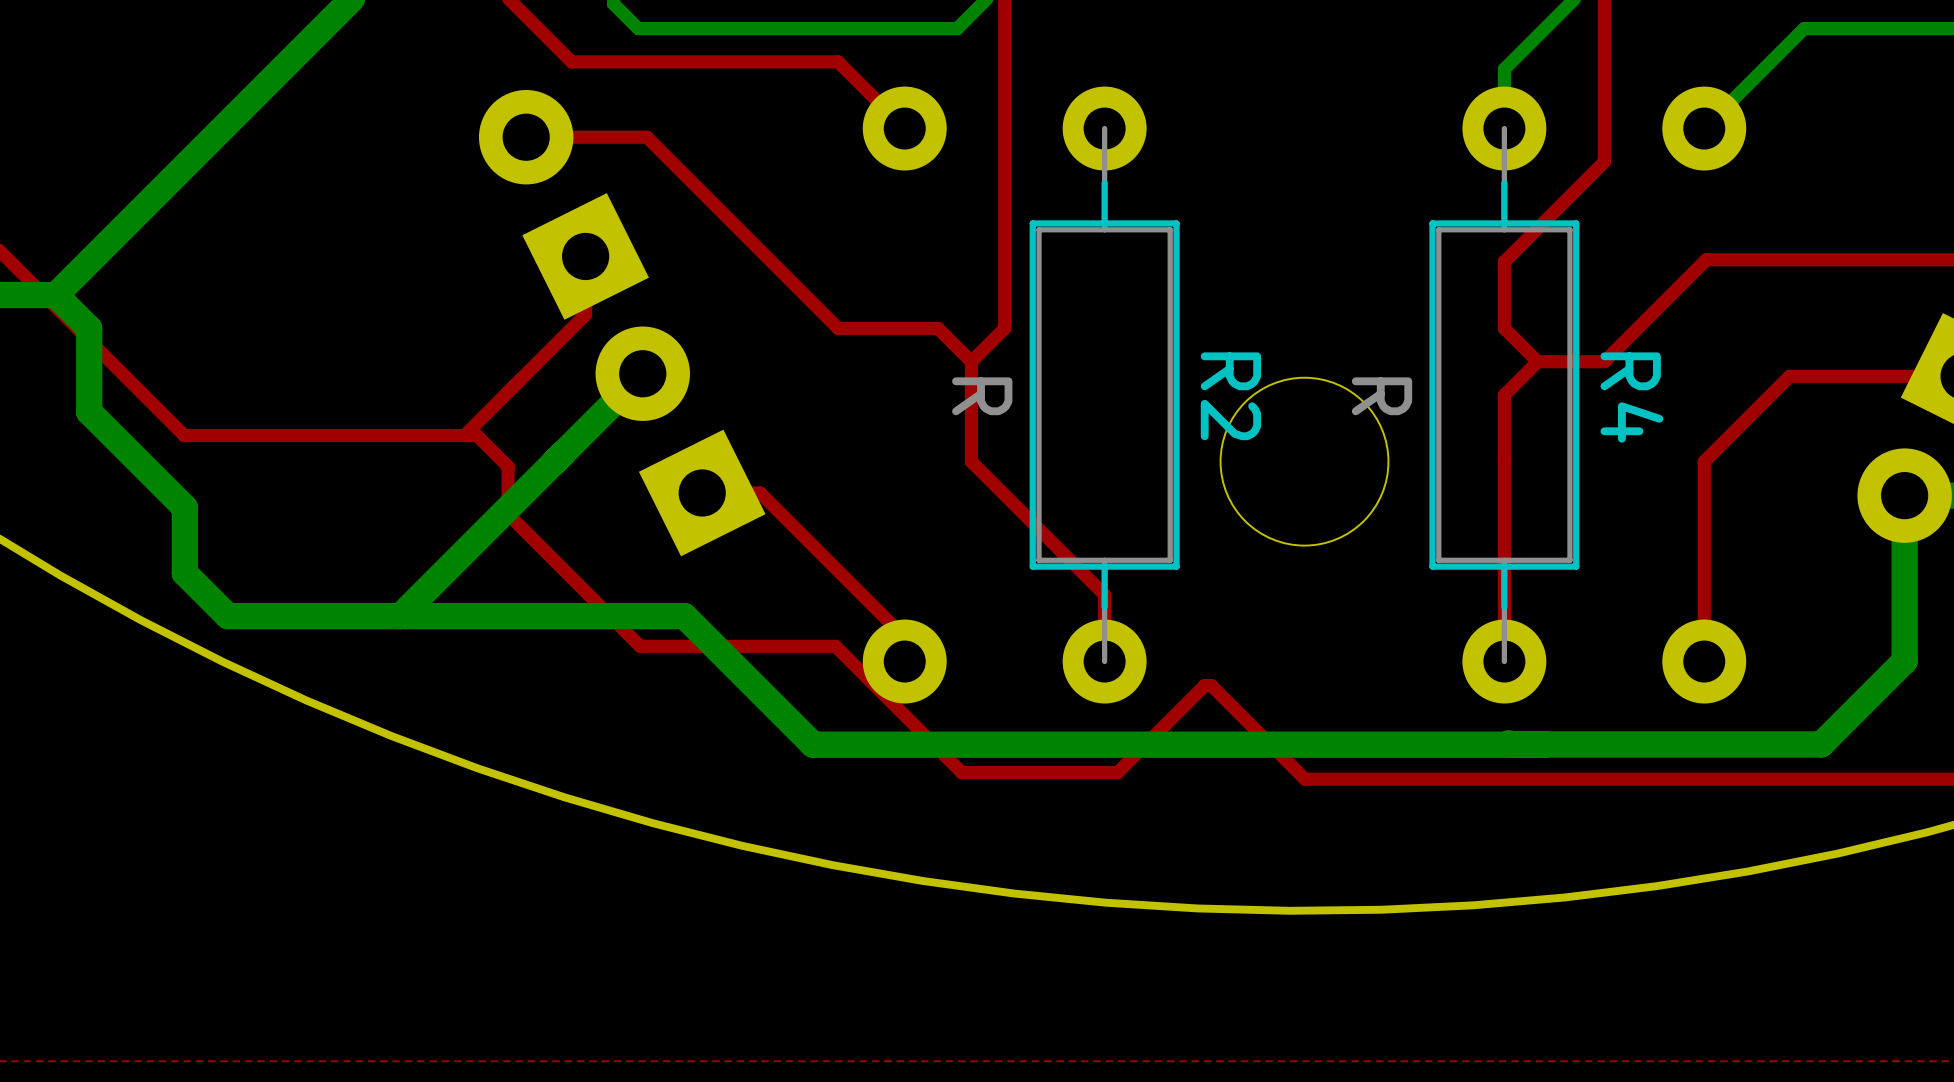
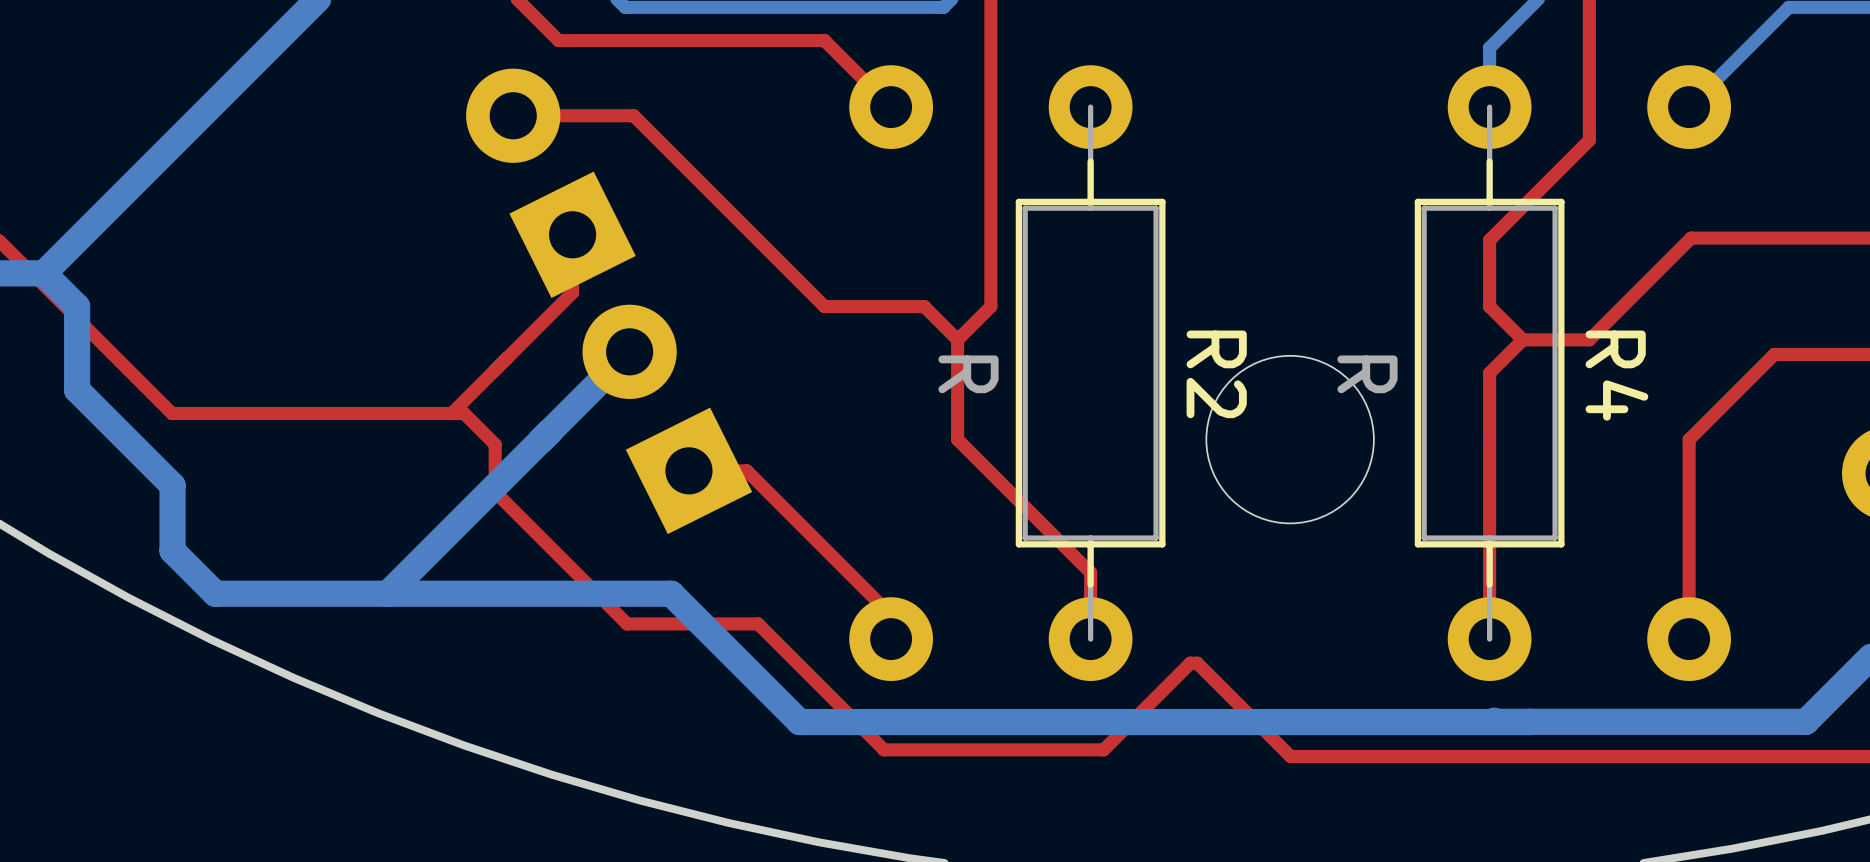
top track: (771, 646) (835, 646) (961, 772) -> (758, 623) (884, 749) (948, 749)

